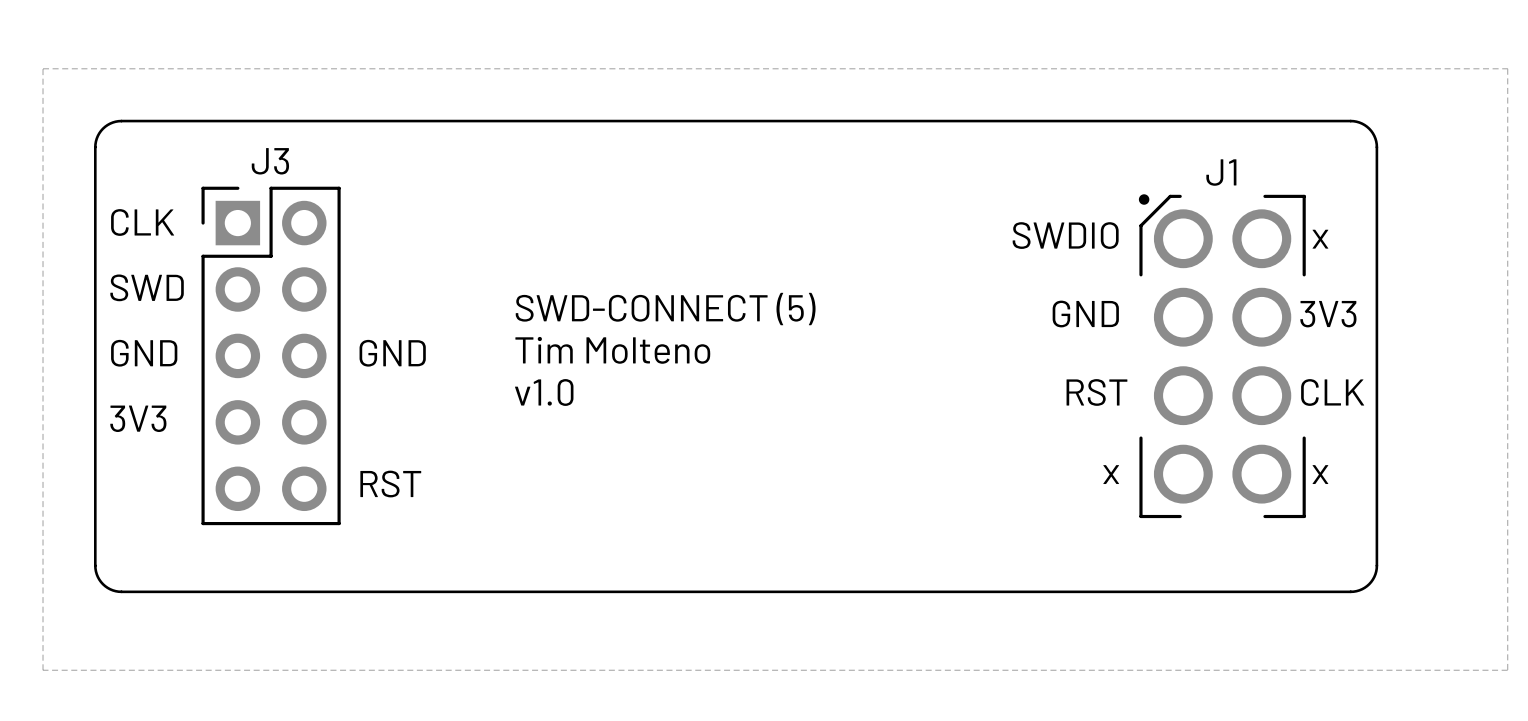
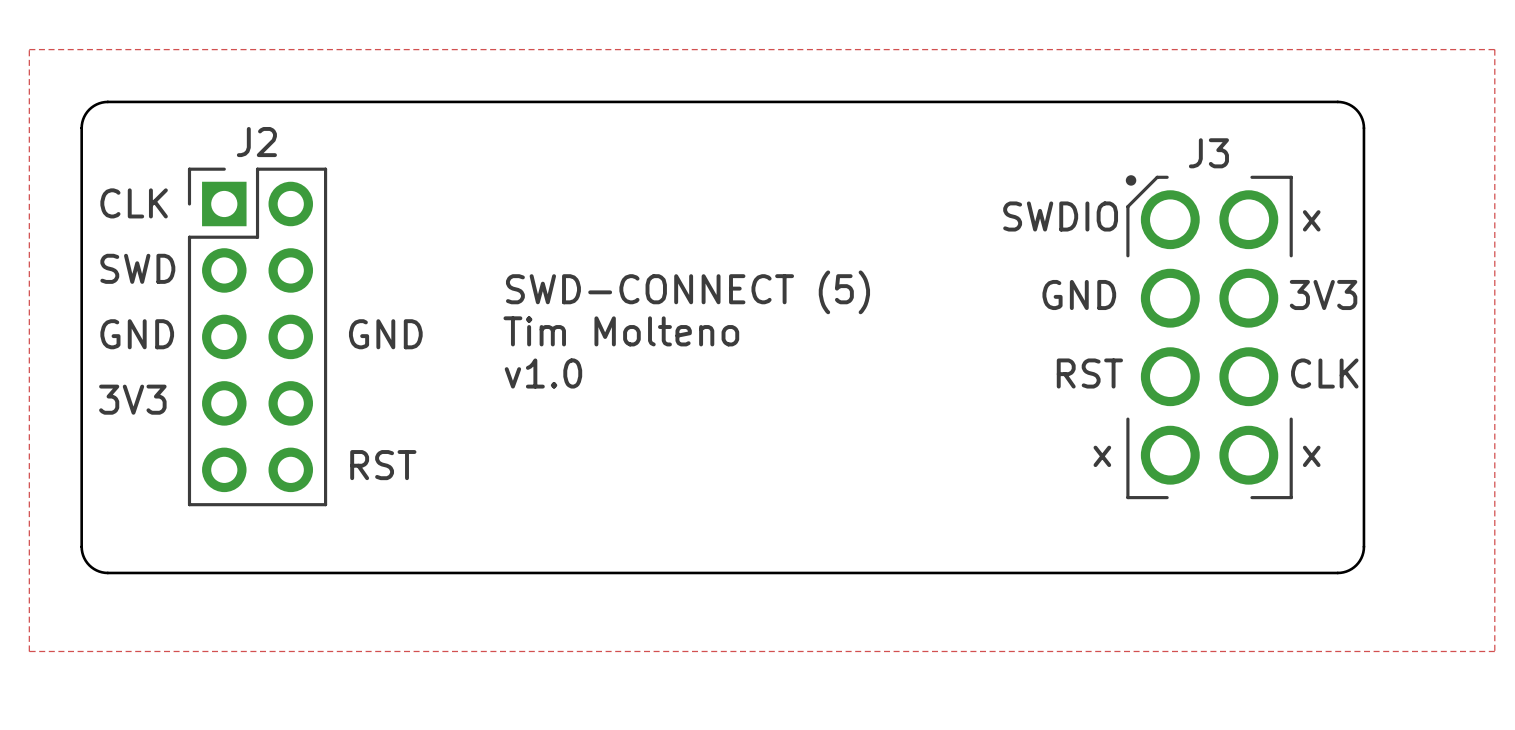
J3 name: J3 (270, 161) -> J2 (256, 142)
J1 name: J1 (1221, 172) -> J3 (1208, 153)

